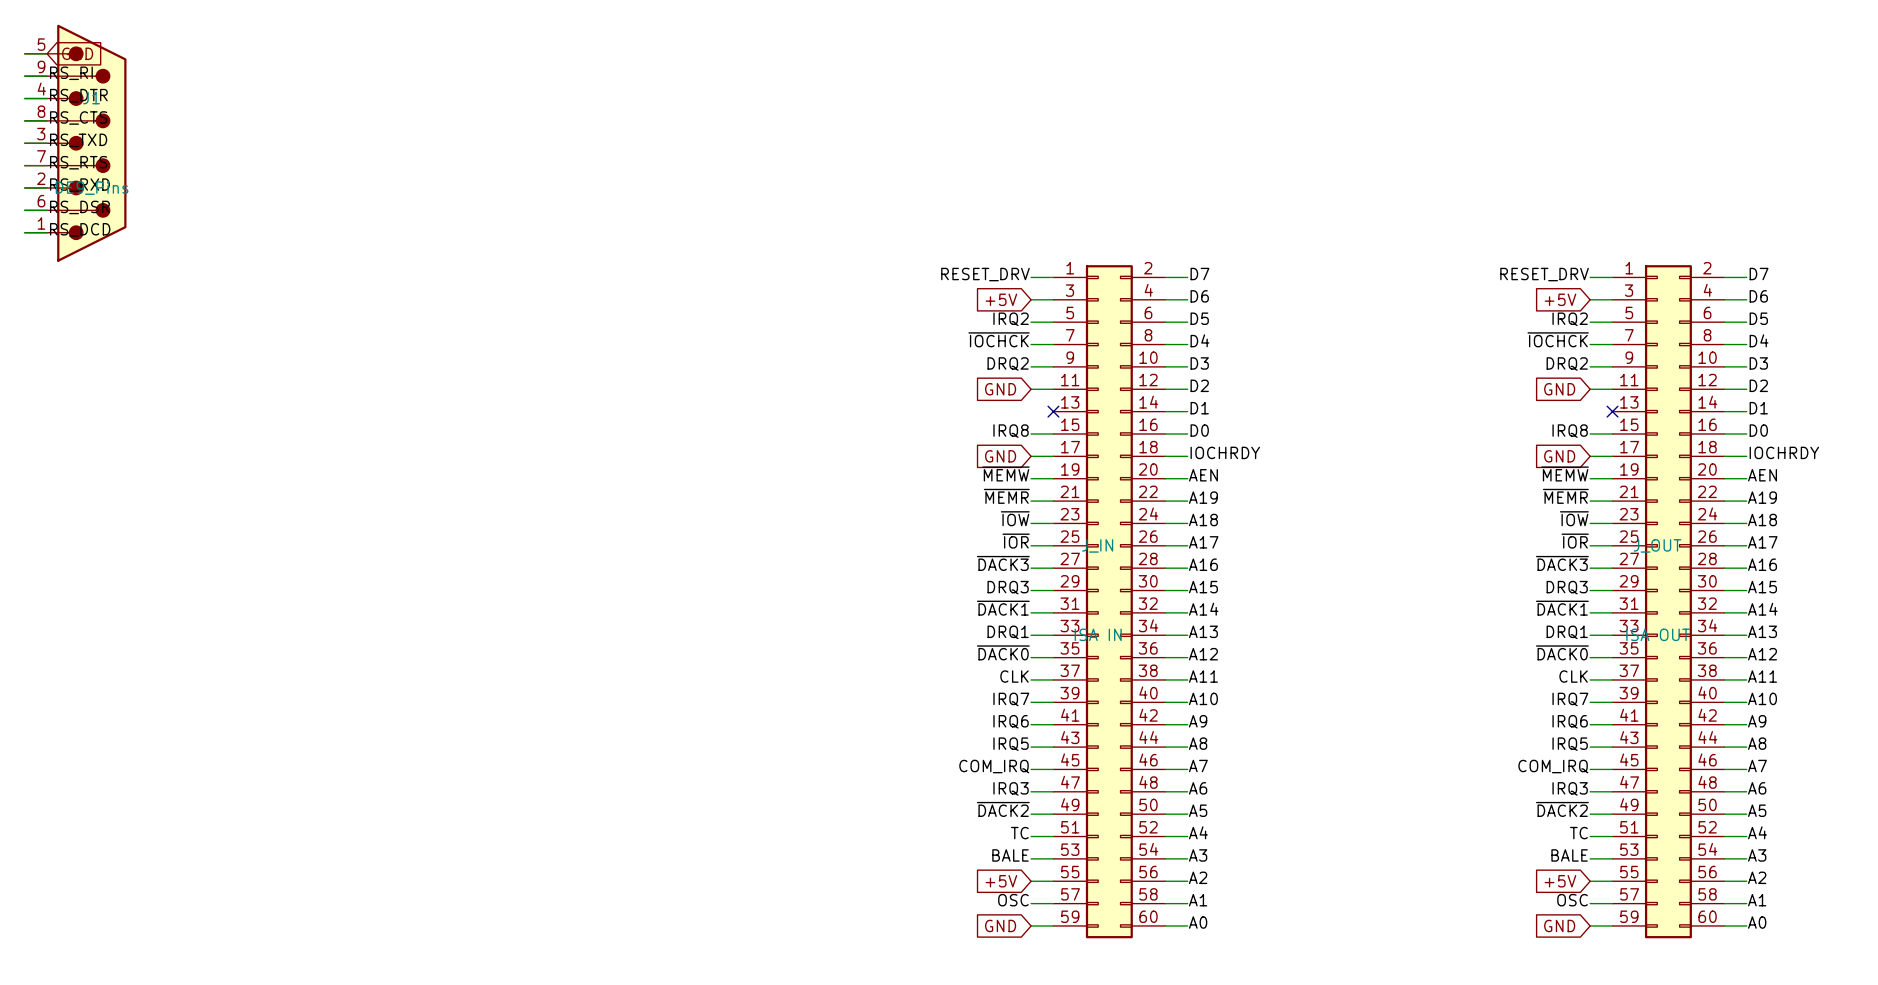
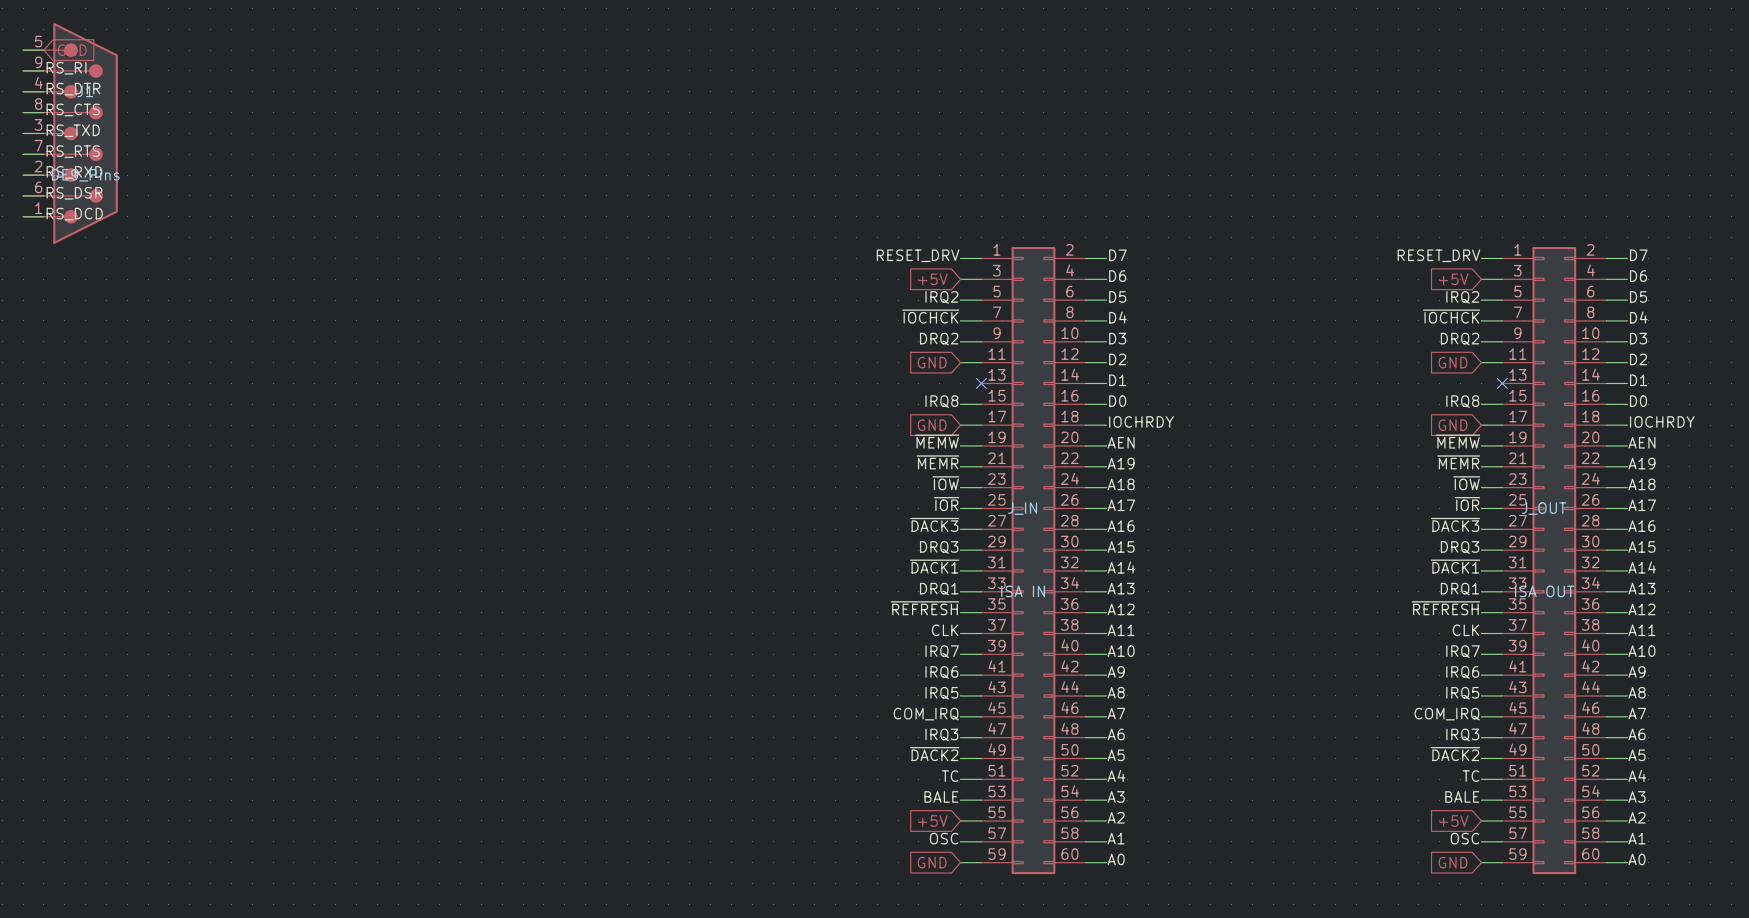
label: ~{DACK0} (1003, 652) -> ~{REFRESH} (925, 608)
label: ~{DACK0} (1562, 652) -> ~{REFRESH} (1445, 608)

